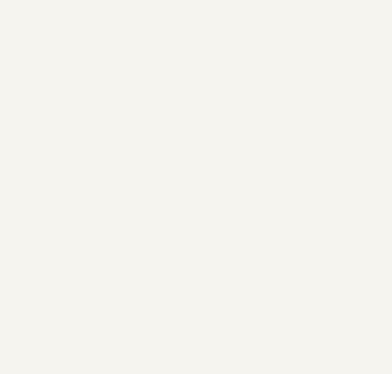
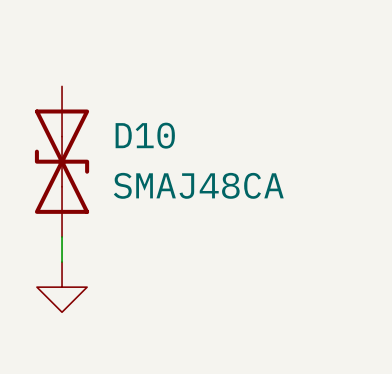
D10: none -> SMAJ48CA (62, 161)
wire: none -> (62, 236) (62, 262)
power symbol: none -> (62, 287)

